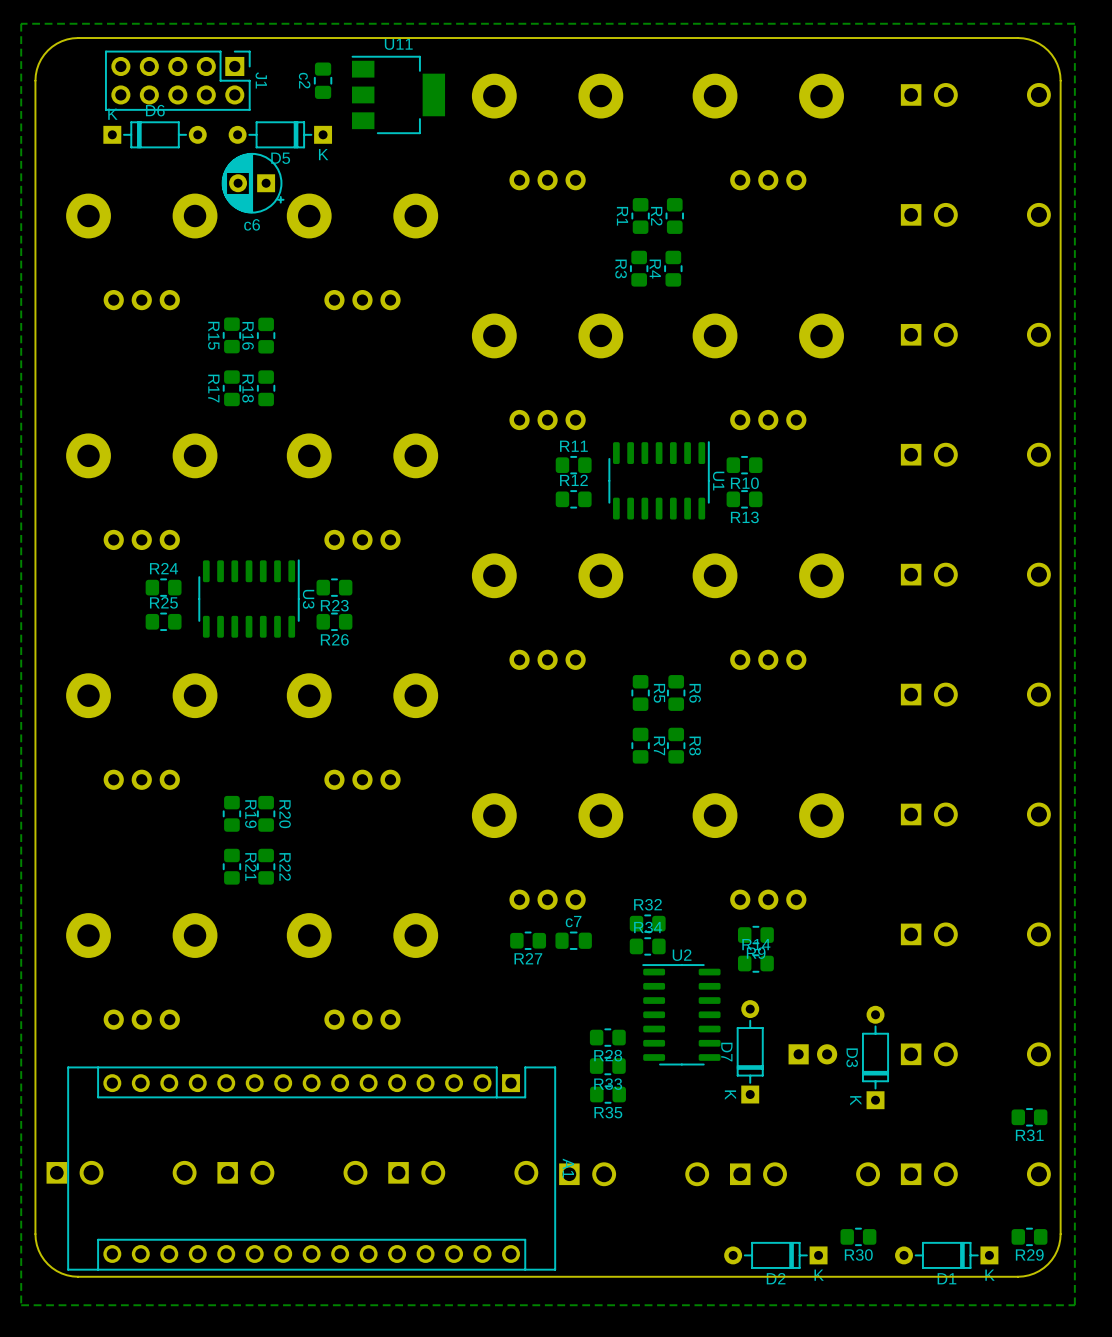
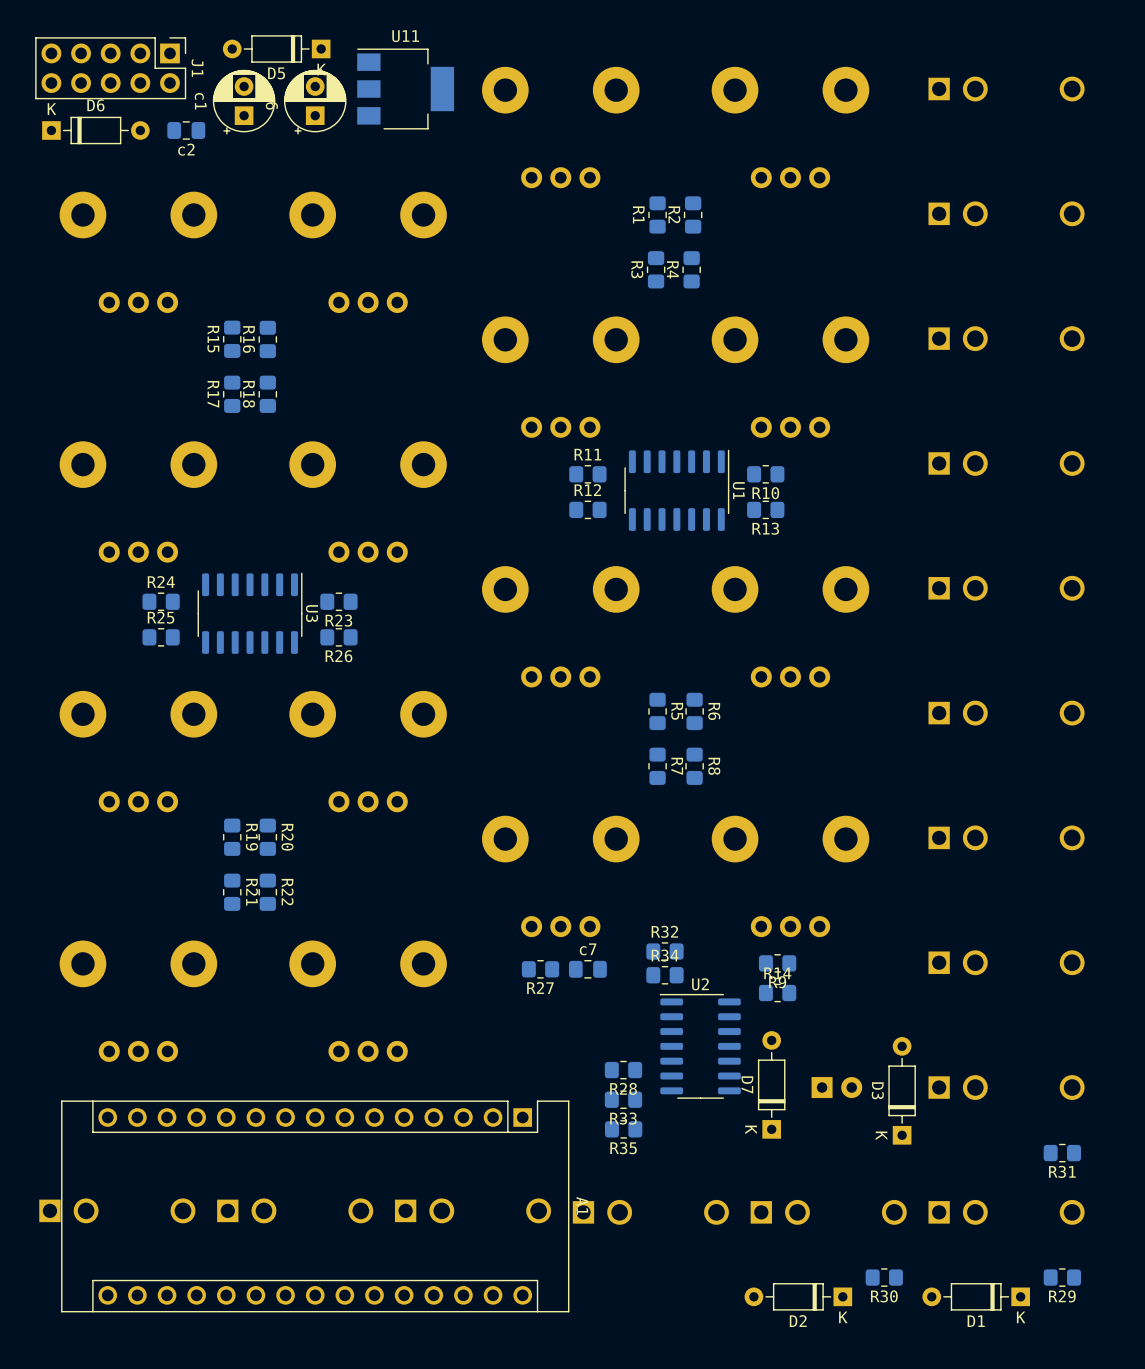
zone outline: (1074, 23) (1074, 1305) (21, 1305) (21, 23) (1074, 23) -> none
board edge: (1017, 38) (78, 38) (61, 41) (44, 54) (36, 69) (35, 80) (35, 1234) (41, 1255) (52, 1267) (67, 1275) (78, 1276) (1017, 1276) (1039, 1271) (1051, 1260) (1059, 1245) (1060, 1234) (1060, 80) (1057, 64) (1048, 50) (1034, 41) (1017, 38) -> none
J1 position: (177, 80) -> (110, 68)
c2 name position: c2 (304, 80) -> c2 (186, 149)
c2 rotation: 0° (323, 80) -> 90° clockwise (186, 130)
c2 position: (323, 80) -> (186, 130)
c1: none -> (244, 102)
D6 position: (155, 134) -> (95, 130)
D5 position: (280, 134) -> (276, 48)
c6 rotation: 0° (253, 183) -> 90° clockwise (315, 102)
c6 position: (253, 183) -> (315, 102)

